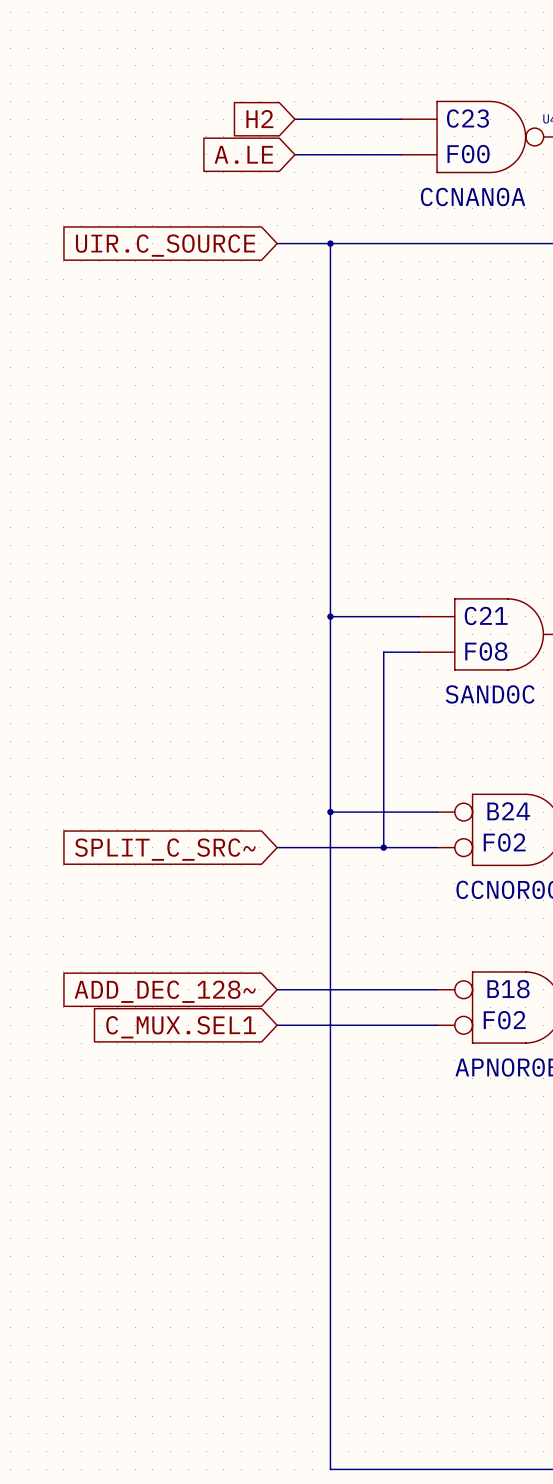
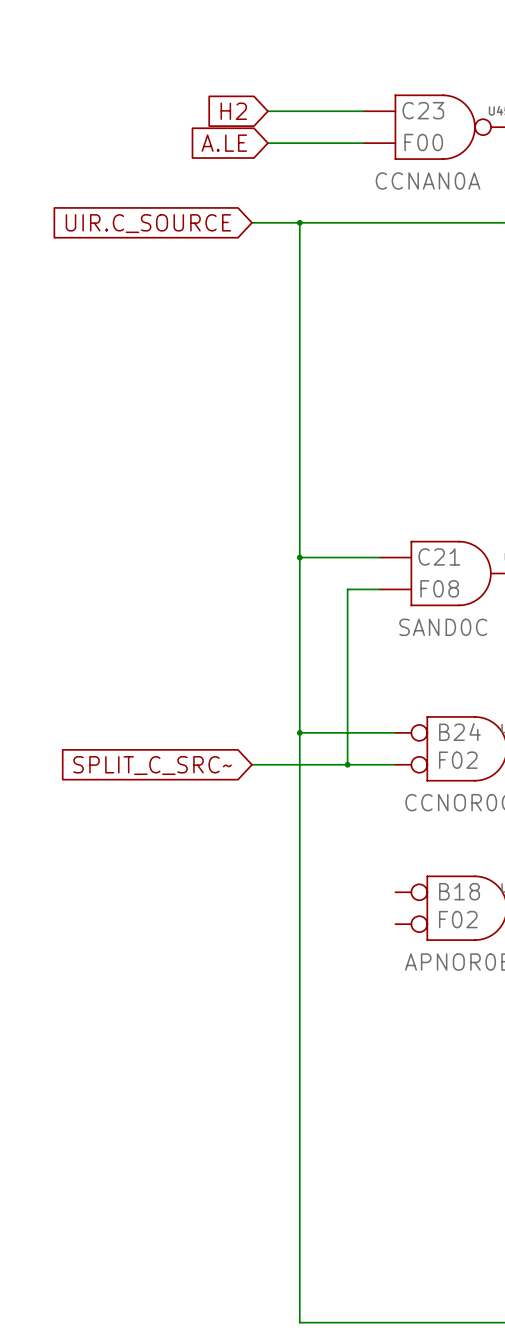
wire: (277, 989) (437, 989) -> none
global label: ADD_DEC_128~ (165, 991) -> none
wire: (277, 1025) (437, 1025) -> none
global label: C_MUX.SEL1 (181, 1027) -> none

